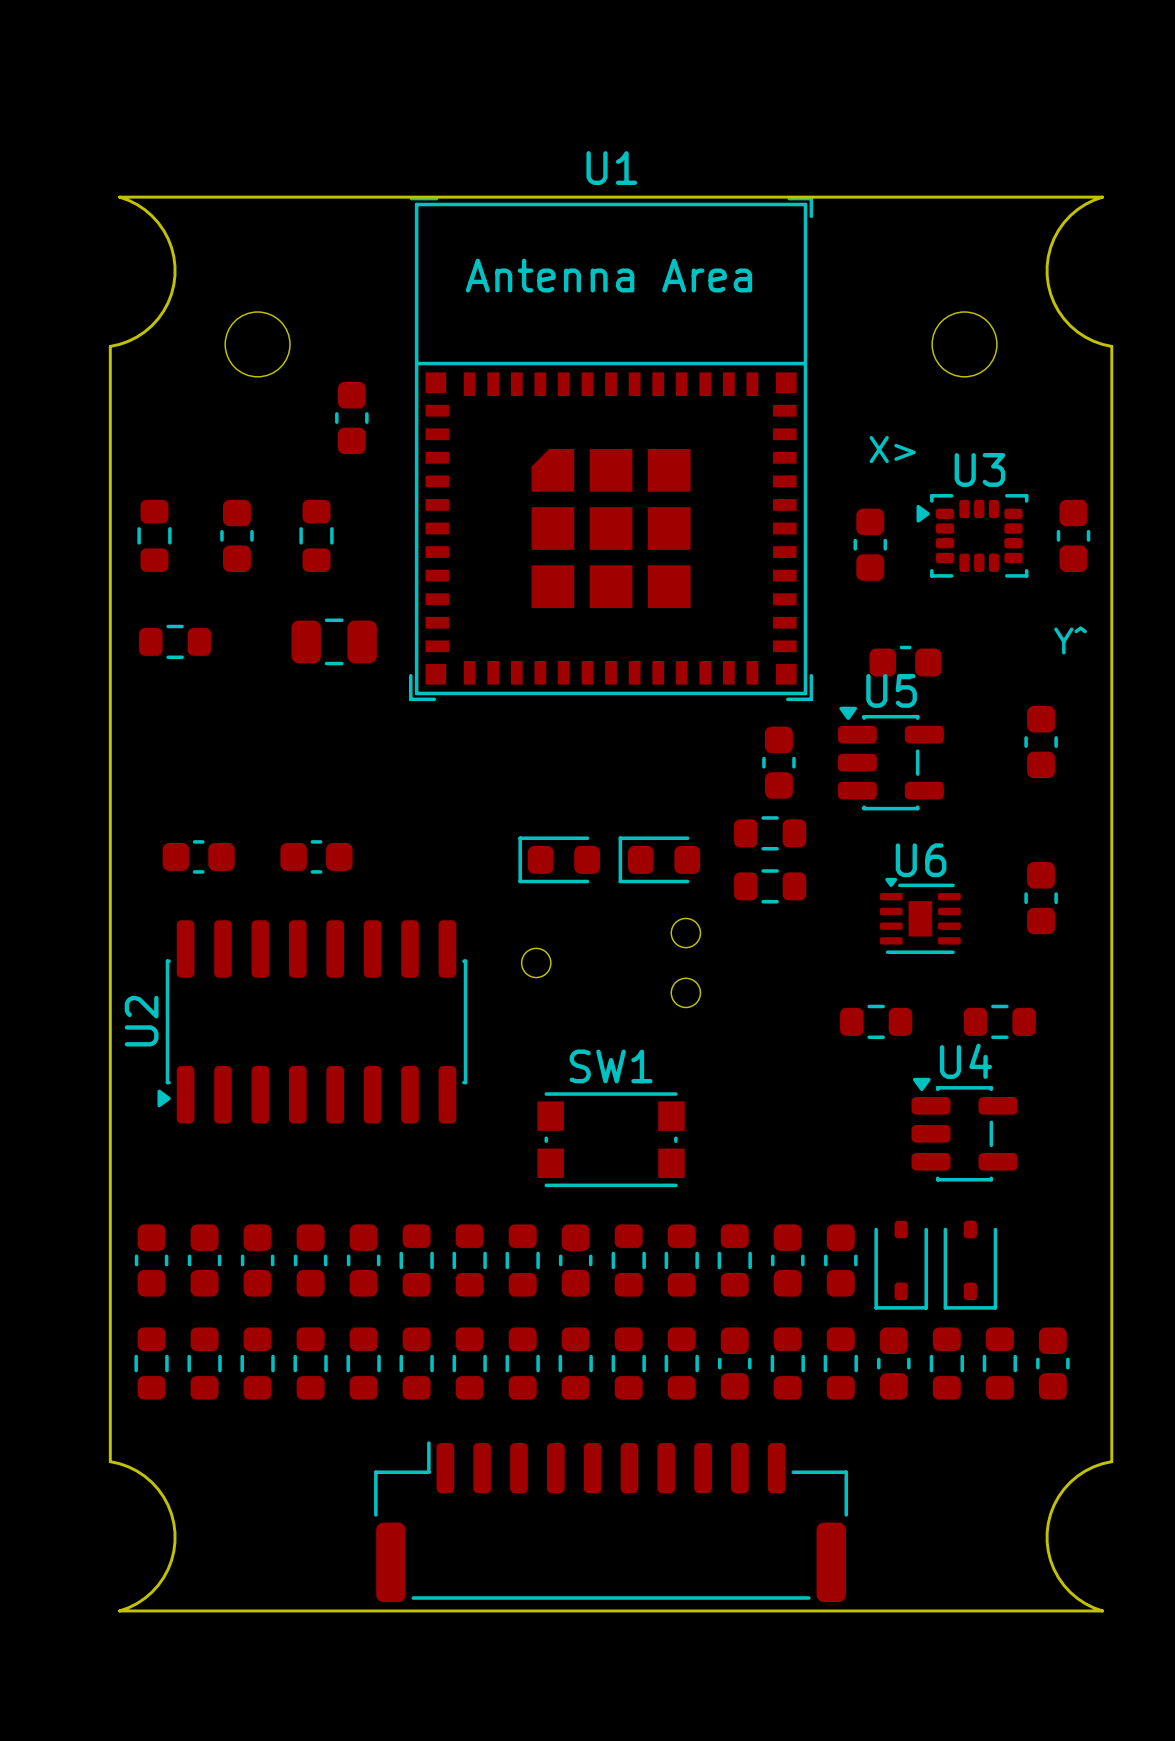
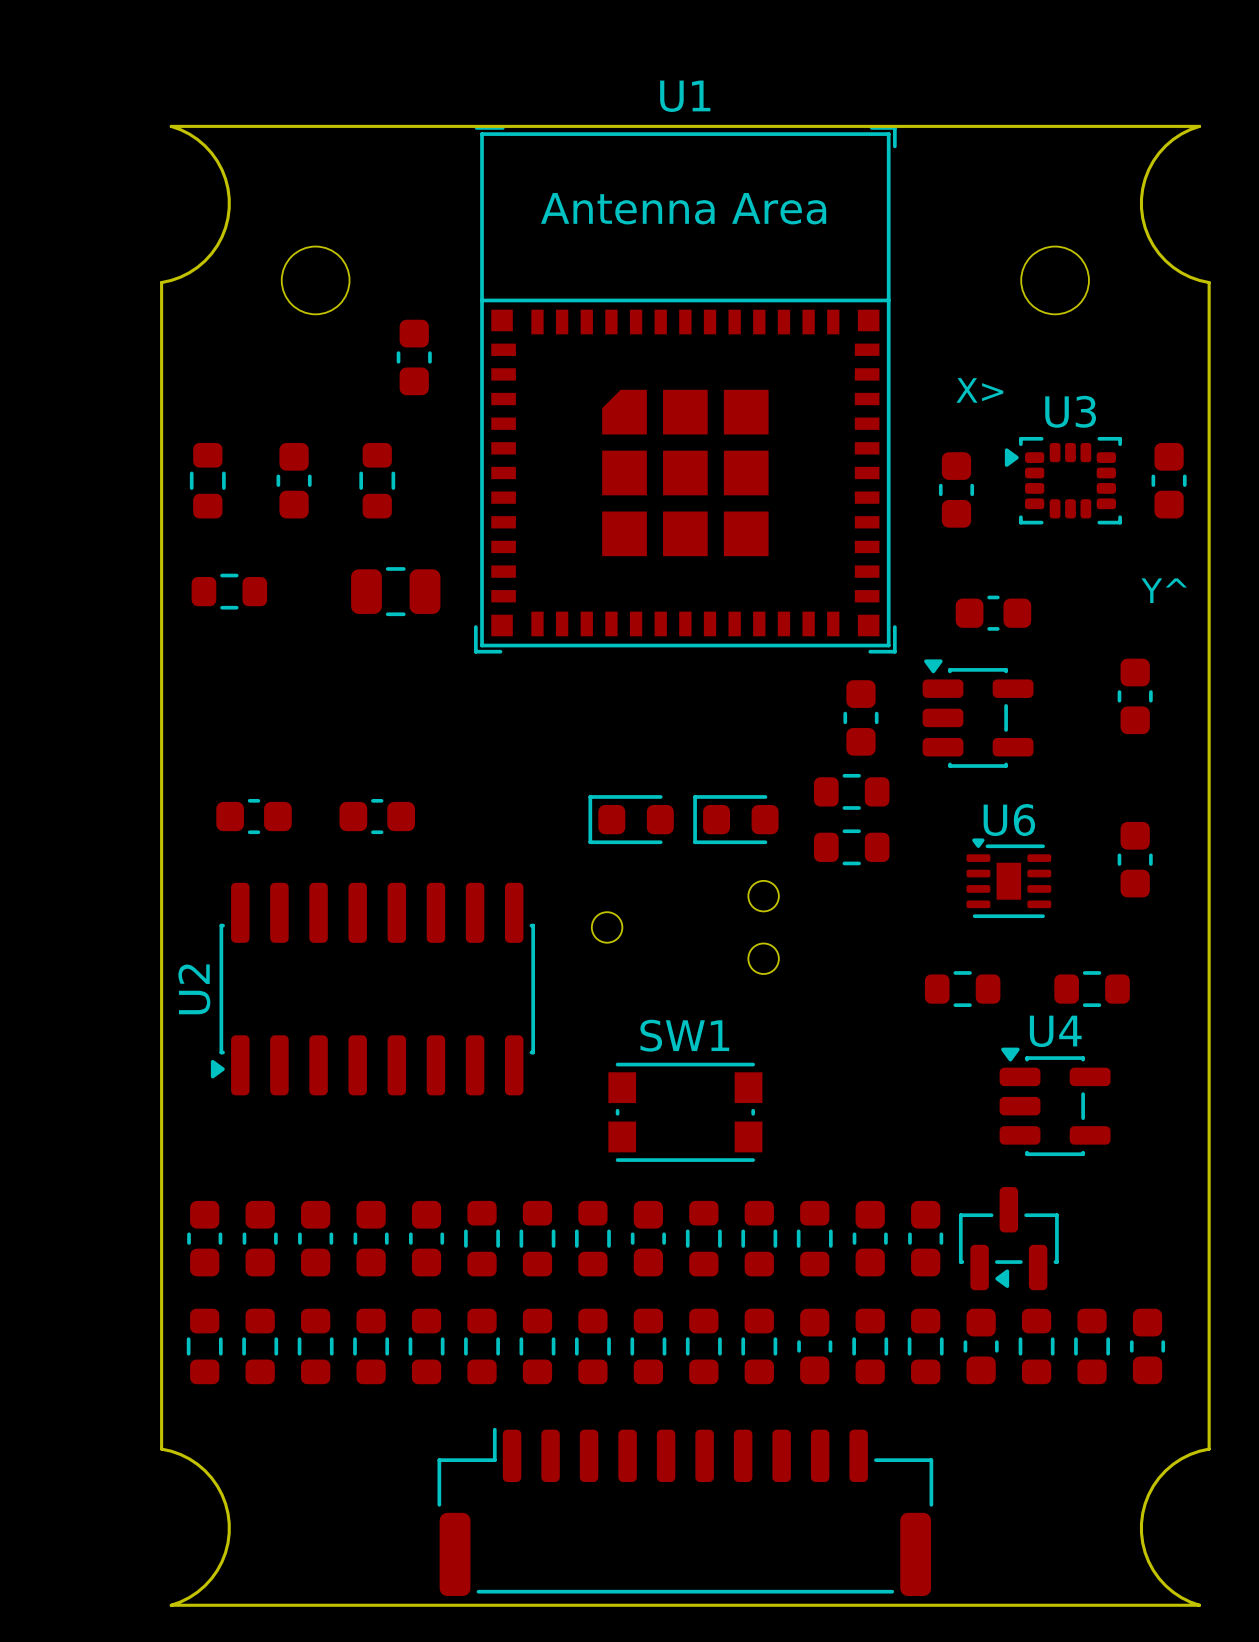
U5 name: U5 (891, 690) -> none
part footprint: [874, 1220, 928, 1310] -> [958, 1187, 1059, 1291]
part: (970, 1265) -> none

